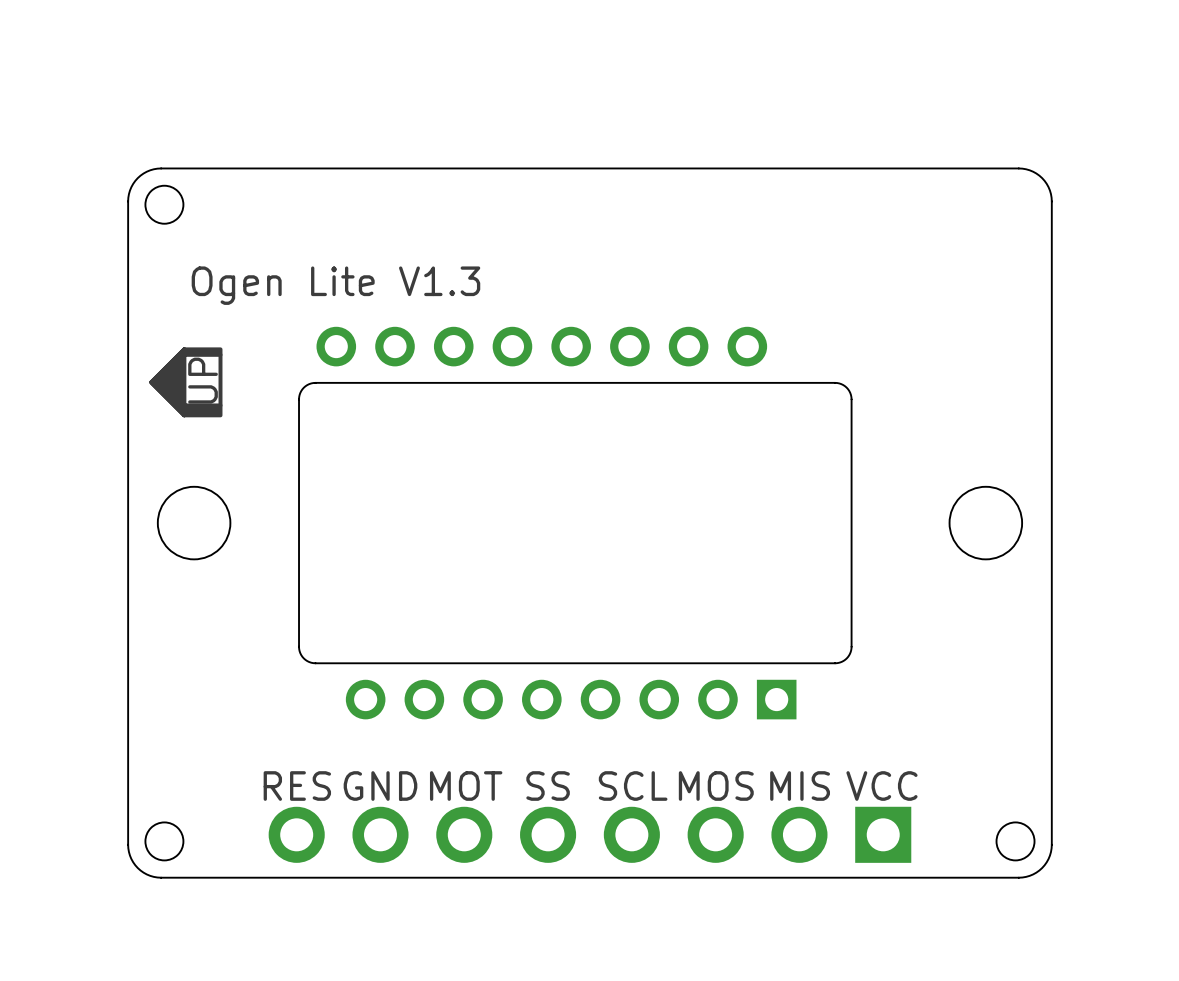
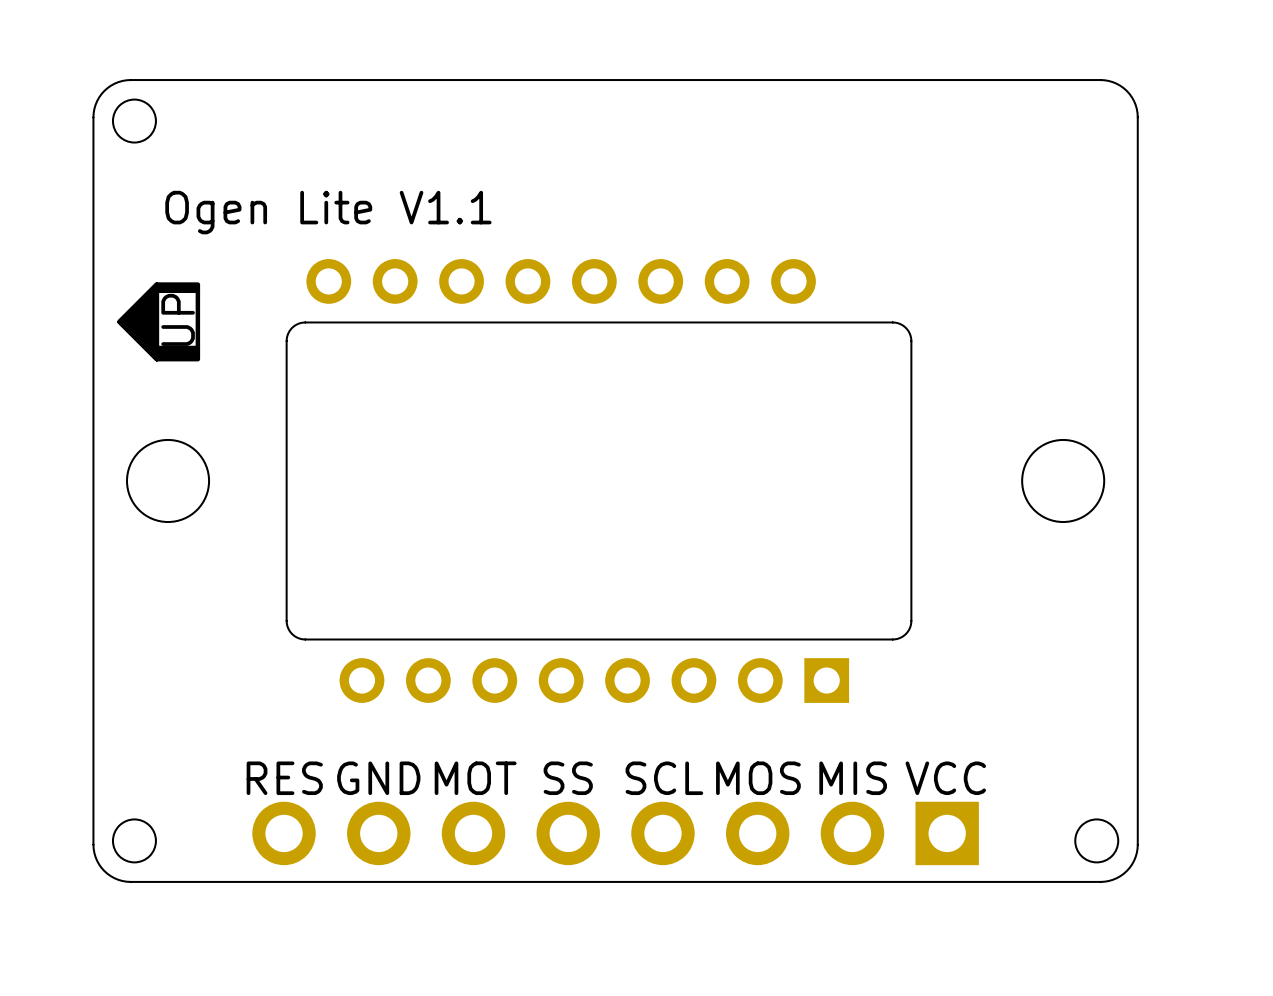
text: Ogen Lite V1.3 (335, 285) -> Ogen Lite V1.1 (328, 212)

